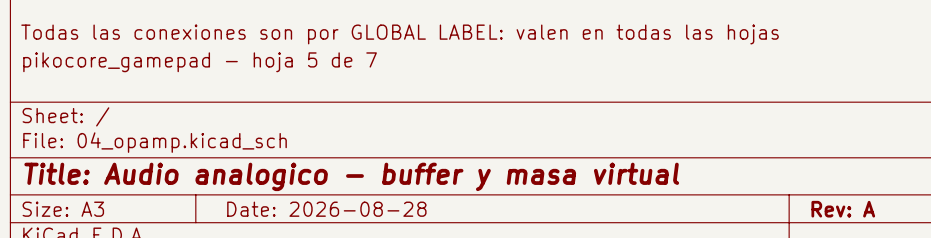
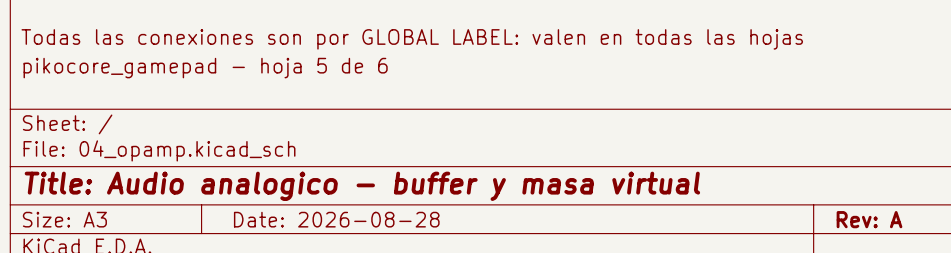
title block: pikocore_gamepad - hoja 5 de 7 (200, 62) -> pikocore_gamepad - hoja 5 de 6 (205, 68)

